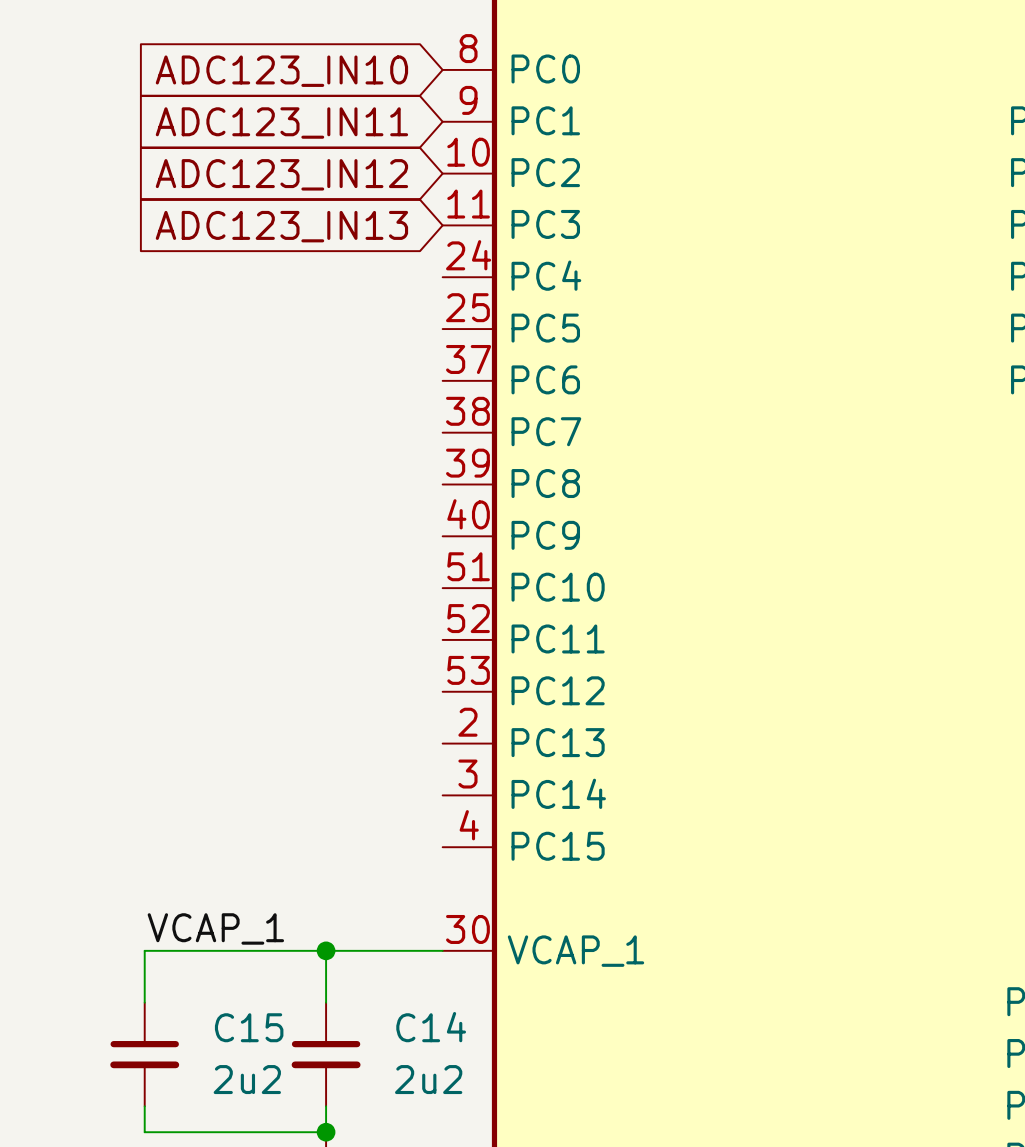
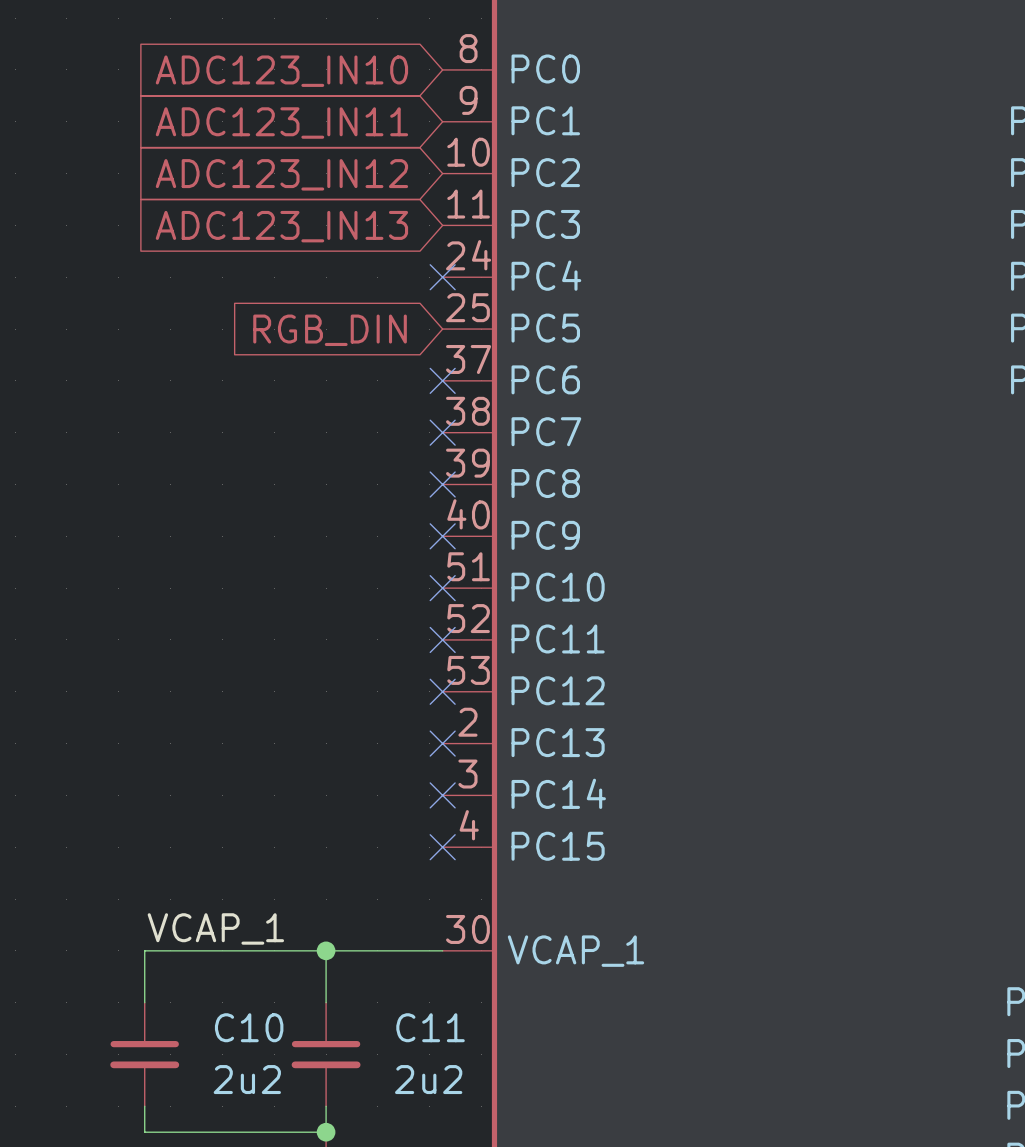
no-connect mark: none -> (442, 277)
global label: none -> RGB_DIN (330, 330)
no-connect mark: none -> (442, 380)
no-connect mark: none -> (442, 432)
no-connect mark: none -> (442, 484)
no-connect mark: none -> (442, 536)
no-connect mark: none -> (442, 588)
no-connect mark: none -> (442, 639)
no-connect mark: none -> (442, 691)
no-connect mark: none -> (442, 743)
no-connect mark: none -> (442, 795)
no-connect mark: none -> (442, 847)
C15 name: C15 (249, 1027) -> C10 (249, 1027)
C14 name: C14 (431, 1027) -> C11 (430, 1027)

